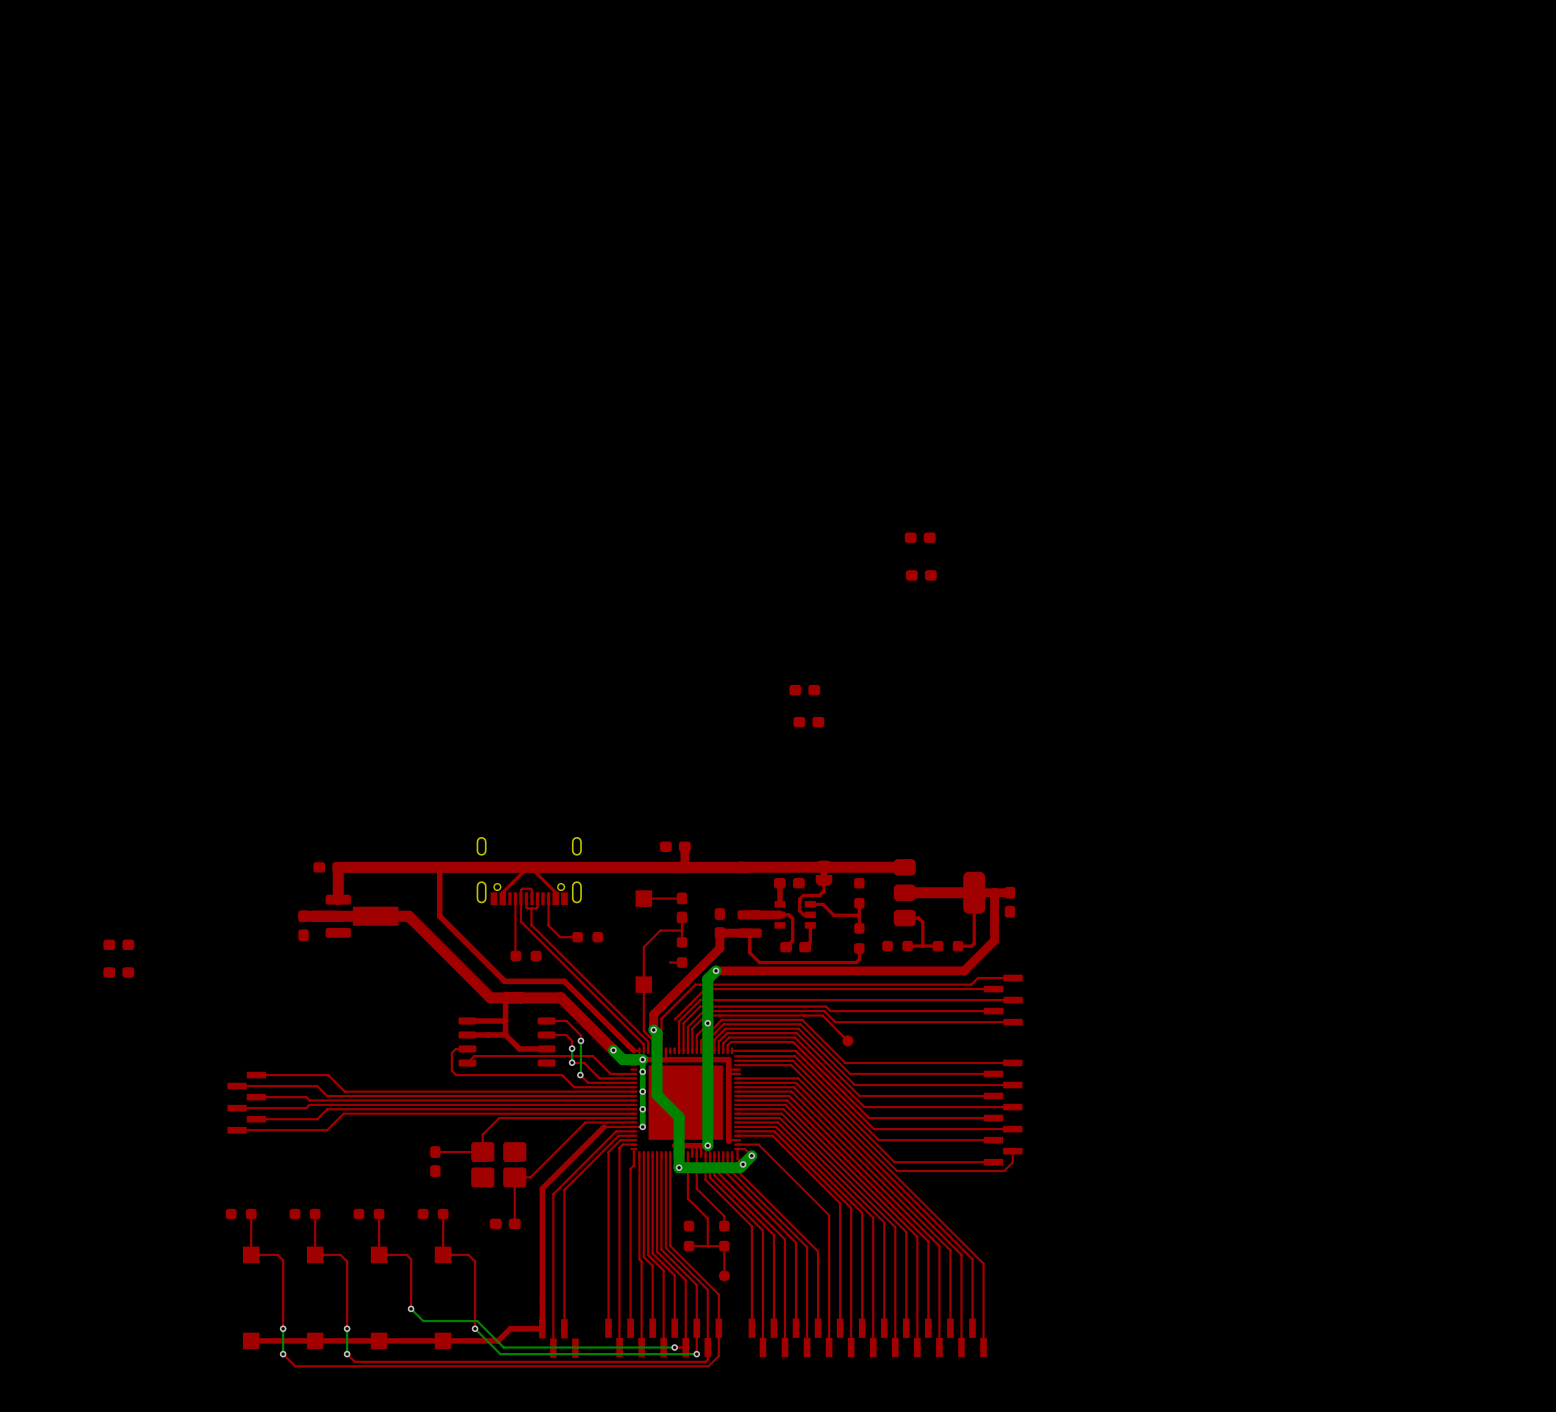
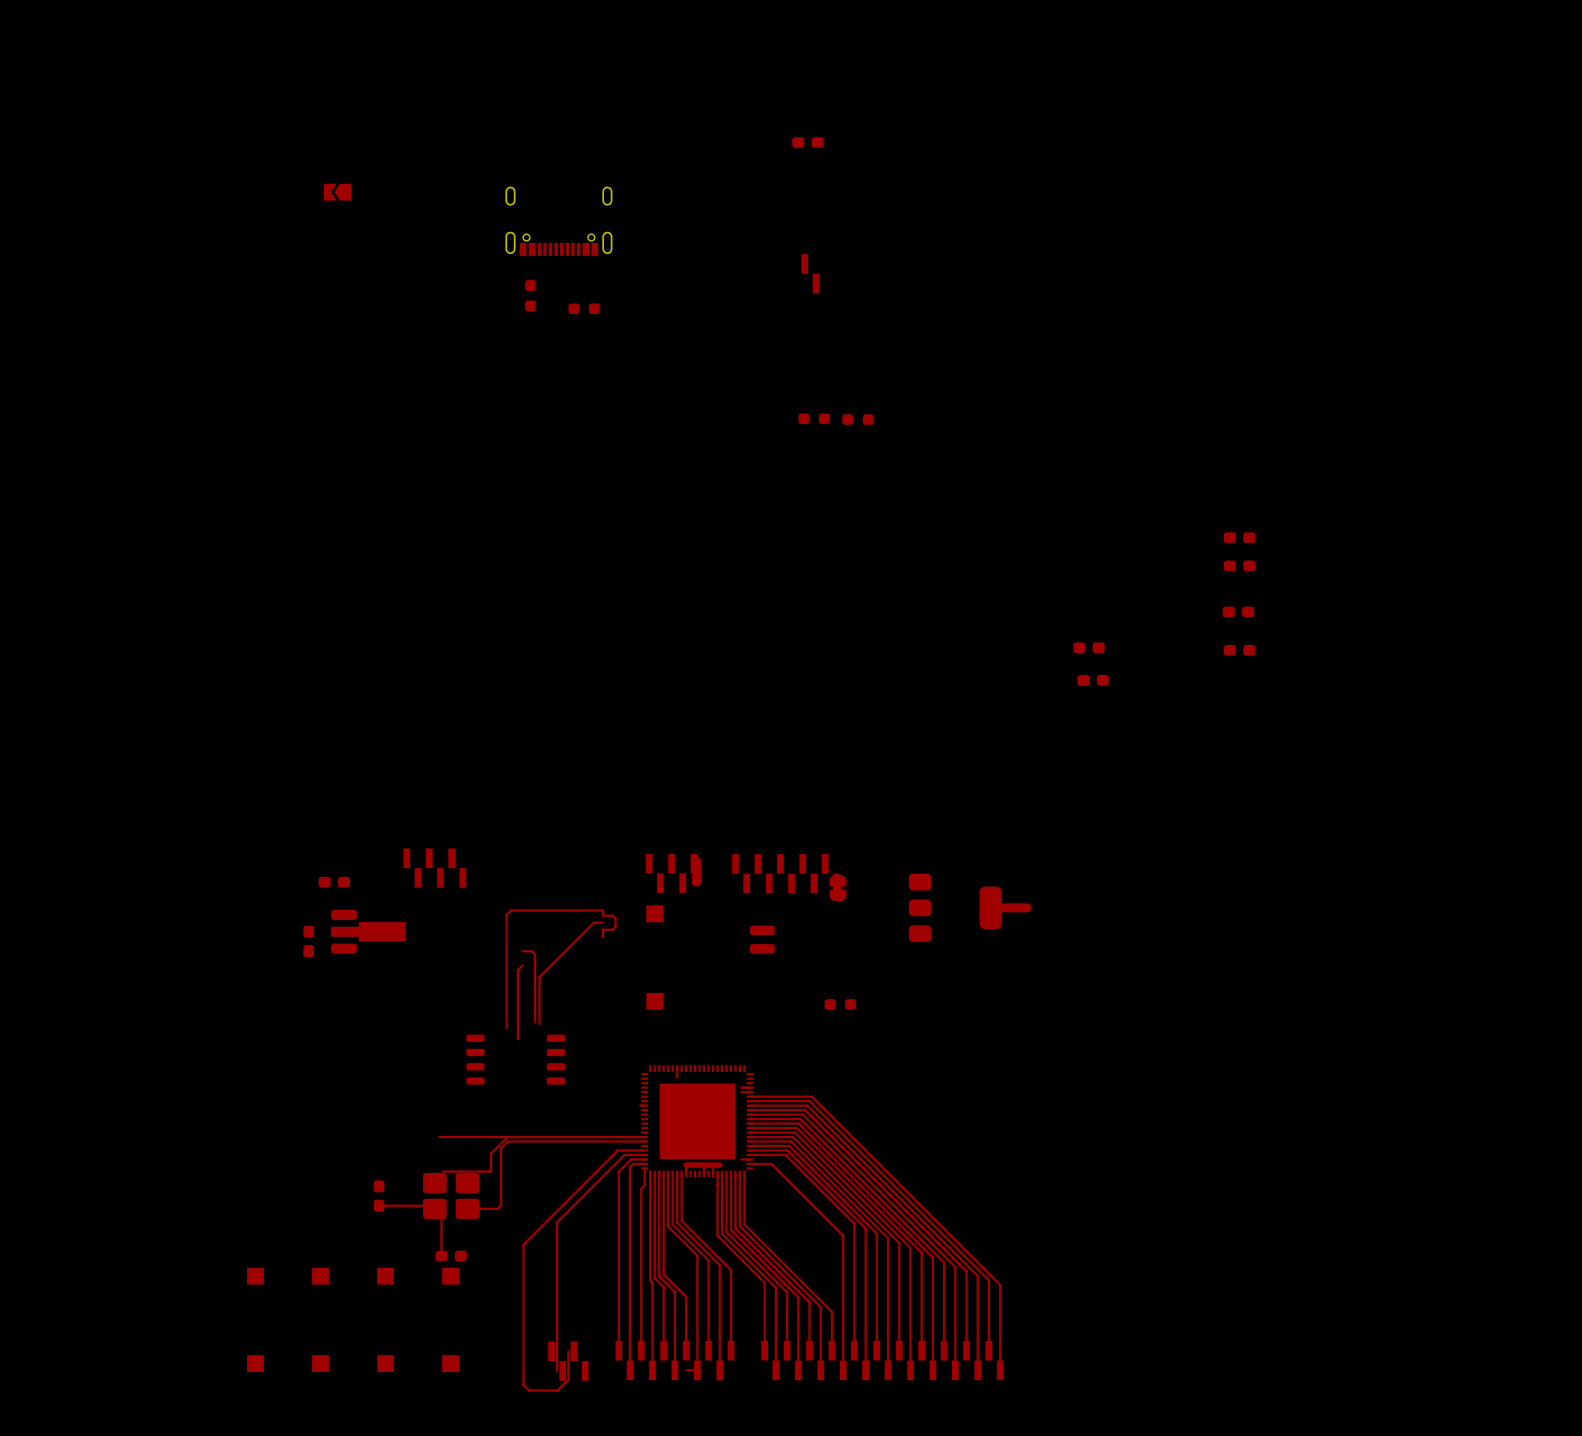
part: none -> (807, 142)
part: none -> (337, 192)
part: none -> (558, 221)
part: none -> (810, 273)
part: none -> (530, 295)
part: none -> (584, 308)
part: none -> (814, 418)
part: none -> (858, 419)
part: none -> (1239, 537)
part: (920, 537) -> none
part: none -> (1239, 565)
part: (921, 575) -> none
part: none -> (1238, 611)
part: none -> (1088, 647)
part: none -> (1239, 650)
part: none -> (1093, 680)
part: (804, 690) -> none
part: (808, 722) -> none
part: (675, 846) -> none
part: none -> (434, 868)
part: none -> (671, 873)
part: none -> (785, 873)
top track: (439, 867) (439, 916) (504, 981) (564, 981) (633, 1050) (639, 1050) -> none
top track: (745, 867) (338, 867) (338, 899) -> none
top track: (904, 867) (739, 867) -> none
part: (529, 871) -> none
top track: (824, 880) (824, 891) (819, 895) (803, 895) (799, 899) (799, 910) (803, 914) (810, 914) -> none
top track: (779, 883) (779, 904) -> none
part: (789, 883) -> none
top track: (904, 892) (974, 892) (974, 943) (971, 946) (958, 946) -> none
top track: (994, 892) (994, 940) (964, 970) (716, 970) -> none
part: (859, 893) -> none
top track: (515, 898) (515, 955) -> none
top track: (531, 898) (530, 888) (520, 890) (520, 921) (643, 1044) (643, 1050) -> none
top track: (537, 898) (536, 908) (526, 907) (526, 898) -> none
top track: (548, 898) (548, 925) (560, 937) (577, 937) -> none
top track: (555, 898) (555, 892) (530, 867) (527, 867) (502, 892) (502, 898) -> none
top track: (681, 898) (643, 898) -> none
part: (1010, 902) -> none
top track: (859, 903) (859, 928) -> none
top track: (810, 904) (823, 904) (833, 915) (859, 915) -> none
top track: none -> (602, 922) (593, 922) (539, 977) (539, 1024)
part: (681, 907) -> none
top track: (531, 908) (531, 925) (648, 1041) (648, 1050) -> none
top track: (749, 914) (788, 914) (792, 918) (792, 940) (786, 947) -> none
part: (795, 914) -> none
top track: (303, 916) (408, 916) (490, 997) (561, 997) (613, 1050) -> none
top track: (681, 917) (681, 942) -> none
top track: (904, 918) (918, 918) (922, 922) (922, 946) -> none
top track: none -> (602, 936) (602, 929) (612, 929) (615, 926) (615, 918) (612, 915) (602, 915) (602, 910) (511, 910) (506, 914) (506, 1028)
part: (719, 923) -> none
top track: (810, 925) (810, 941) (805, 947) -> none
top track: (681, 930) (660, 930) (643, 947) (643, 1030) (652, 1039) (652, 1050) -> none
top track: none -> (522, 951) (531, 951) (534, 954) (534, 1022)
part: (587, 937) -> none
part: (859, 938) -> none
part: (118, 944) -> none
part: (897, 946) -> none
top track: (937, 946) (907, 946) -> none
part: (948, 946) -> none
part: (795, 947) -> none
top track: (859, 948) (859, 959) (856, 962) (759, 962) (749, 952) (749, 933) (719, 933) (719, 948) (653, 1014) (653, 1029) -> none
top track: none -> (522, 965) (517, 970) (517, 1039)
part: (681, 952) -> none
part: (525, 955) -> none
top track: (681, 962) (670, 962) -> none
bottom track: (716, 970) (707, 979) (707, 1145) -> none
via: (716, 970) -> none
part: (118, 972) -> none
top track: (1013, 978) (978, 978) (971, 984) (695, 984) (661, 1018) (661, 1050) -> none
part: none -> (840, 1004)
top track: (993, 989) (705, 989) (674, 1019) -> none
top track: (505, 997) (505, 1034) -> none
part: (1003, 1000) -> none
top track: (1013, 1000) (700, 1000) (679, 1021) (679, 1050) -> none
top track: (993, 1011) (830, 1011) (826, 1006) (700, 1006) (683, 1023) (683, 1050) -> none
top track: (719, 1015) (705, 1015) (692, 1028) (692, 1050) -> none
top track: (804, 1015) (719, 1015) -> none
top track: (804, 1015) (822, 1015) (847, 1040) -> none
top track: (505, 1020) (467, 1020) -> none
top track: (546, 1020) (566, 1020) (580, 1035) (580, 1040) -> none
top track: (1013, 1022) (835, 1022) (824, 1011) (703, 1011) (687, 1026) (687, 1050) -> none
top track: (707, 1023) (696, 1035) (696, 1050) -> none
via: (707, 1023) -> none
bottom track: (653, 1029) (657, 1033) (657, 1094) (679, 1116) (679, 1167) (739, 1167) (751, 1155) -> none
via: (653, 1029) -> none
top track: (505, 1034) (519, 1048) (546, 1048) -> none
top track: (505, 1034) (467, 1034) -> none
top track: (546, 1034) (566, 1034) (572, 1040) (572, 1048) -> none
bottom track: (580, 1040) (580, 1075) -> none
via: (580, 1040) -> none
part: (847, 1040) -> none
top track: (467, 1048) (455, 1048) (451, 1053) (451, 1070) (456, 1075) (562, 1075) (574, 1087) (629, 1087) -> none
bottom track: (572, 1048) (572, 1062) -> none
via: (572, 1048) -> none
bottom track: (613, 1050) (622, 1059) (642, 1059) (642, 1126) -> none
via: (613, 1050) -> none
top track: (701, 1050) (701, 1040) (721, 1019) (802, 1019) (845, 1062) (1012, 1062) -> none
top track: (709, 1050) (709, 1037) (723, 1024) (800, 1024) (850, 1073) (993, 1073) -> none
top track: (714, 1050) (714, 1039) (725, 1028) (798, 1028) (854, 1085) (1012, 1085) -> none
top track: (718, 1050) (718, 1041) (727, 1033) (796, 1033) (859, 1096) (993, 1096) -> none
top track: (723, 1050) (723, 1043) (729, 1037) (794, 1037) (864, 1107) (1012, 1107) -> none
top track: (727, 1050) (727, 1045) (730, 1041) (793, 1041) (869, 1118) (993, 1118) -> none
top track: (732, 1050) (795, 1050) (873, 1129) (1012, 1129) -> none
top track: (737, 1056) (794, 1056) (878, 1140) (993, 1140) -> none
via: (642, 1059) -> none
top track: (737, 1060) (793, 1060) (894, 1162) (993, 1162) -> none
top track: (572, 1062) (584, 1062) (599, 1078) (633, 1078) -> none
via: (572, 1062) -> none
top track: (467, 1063) (474, 1056) (592, 1056) (610, 1073) (633, 1073) -> none
top track: (739, 1065) (791, 1065) (897, 1171) (1004, 1171) (1012, 1162) (1012, 1151) -> none
via: (642, 1071) -> none
top track: (256, 1075) (328, 1075) (344, 1091) (633, 1091) -> none
top track: (580, 1075) (588, 1082) (633, 1082) -> none
via: (580, 1075) -> none
top track: (237, 1086) (317, 1086) (327, 1096) (633, 1096) -> none
via: (642, 1091) -> none
top track: (256, 1097) (306, 1097) (309, 1100) (633, 1100) -> none
part: (246, 1102) -> none
top track: (633, 1104) (309, 1104) (306, 1108) (237, 1108) -> none
top track: (633, 1109) (327, 1109) (317, 1119) (256, 1119) -> none
via: (642, 1109) -> none
part: (1003, 1112) -> none
top track: (633, 1113) (343, 1113) (327, 1130) (237, 1130) -> none
top track: (585, 1122) (530, 1177) (514, 1177) (514, 1223) -> (595, 1141) (507, 1141) (501, 1148) (501, 1205) (497, 1208) (467, 1208)
top track: (641, 1126) (604, 1126) (542, 1188) (542, 1328) (510, 1328) (498, 1340) (251, 1340) -> none
top track: (642, 1126) (642, 1059) (728, 1059) (728, 1141) -> none
via: (642, 1126) -> none
top track: none -> (616, 1150) (523, 1244) (523, 1384) (529, 1390) (557, 1390) (568, 1379) (568, 1351)
top track: (616, 1131) (553, 1194) (553, 1348) -> (626, 1150) (617, 1150)
top track: (618, 1135) (564, 1190) (564, 1328) -> (629, 1154) (624, 1154) (557, 1222) (557, 1370)
top track: (696, 1145) (696, 1188) (724, 1216) (724, 1226) -> none
via: (707, 1145) -> none
top track: (751, 1155) (744, 1148) (737, 1148) (737, 1158) (743, 1164) -> none
via: (751, 1155) -> none
top track: (687, 1156) (687, 1198) (707, 1218) (707, 1244) -> none
part: (435, 1161) -> none
part position: (498, 1164) -> (451, 1195)
via: (743, 1164) -> none
top track: (732, 1165) (818, 1251) (818, 1290) -> (744, 1185) (744, 1224) (831, 1312)
via: (679, 1167) -> none
top track: (727, 1167) (807, 1247) (807, 1285) -> (739, 1187) (739, 1226) (820, 1307)
top track: (723, 1169) (796, 1242) (796, 1280) -> (735, 1189) (735, 1228) (809, 1302)
top track: (718, 1173) (784, 1239) (784, 1275) -> (730, 1193) (730, 1230) (798, 1297)
top track: (714, 1175) (773, 1235) (773, 1271) -> (726, 1195) (726, 1232) (787, 1292)
part: none -> (379, 1196)
top track: (709, 1177) (762, 1230) (762, 1266) -> (722, 1197) (722, 1233) (775, 1287)
top track: (705, 1179) (751, 1226) (751, 1261) -> (717, 1199) (717, 1235) (764, 1282)
top track: none -> (379, 1205) (431, 1205) (441, 1215) (441, 1256)
top track: (670, 1200) (670, 1246) (718, 1294) -> (681, 1220) (730, 1270) (730, 1316)
top track: (665, 1202) (665, 1247) (707, 1289) -> (677, 1222) (719, 1265)
top track: (661, 1204) (661, 1249) (696, 1285) -> (672, 1224) (708, 1260) (708, 1306)
top track: (657, 1206) (657, 1251) (685, 1280) -> (668, 1226) (697, 1255) (697, 1301)
part: (241, 1214) -> none
top track: (251, 1214) (251, 1254) (277, 1254) (283, 1260) (283, 1328) -> none
part: (305, 1214) -> none
top track: (315, 1214) (315, 1254) (340, 1254) (347, 1261) (347, 1328) -> none
part: (369, 1214) -> none
top track: (379, 1214) (379, 1254) (406, 1254) (411, 1259) (411, 1308) -> none
part: (433, 1214) -> none
top track: (443, 1214) (443, 1254) -> none
part: (505, 1223) -> none
part: none -> (451, 1256)
part: (689, 1236) -> none
part: (724, 1236) -> none
top track: (689, 1246) (724, 1246) (724, 1275) -> none
top track: none -> (719, 1267) (719, 1311)
top track: (443, 1254) (468, 1254) (475, 1261) (475, 1328) -> none
part: (724, 1275) -> none
bottom track: (411, 1308) (423, 1321) (477, 1321) (503, 1347) (674, 1347) -> none
via: (411, 1308) -> none
bottom track: (283, 1328) (283, 1356) -> none
via: (283, 1328) -> none
bottom track: (347, 1328) (347, 1354) -> none
via: (347, 1328) -> none
bottom track: (475, 1328) (500, 1354) (696, 1354) -> none
via: (475, 1328) -> none
top track: (696, 1328) (696, 1354) -> none
top track: (718, 1328) (718, 1356) (708, 1366) (295, 1366) (283, 1354) -> none
via: (674, 1347) -> none
top track: (708, 1348) (707, 1347) (707, 1359) (705, 1361) (354, 1361) (347, 1354) -> none
via: (283, 1354) -> none
via: (347, 1354) -> none
via: (696, 1354) -> none

